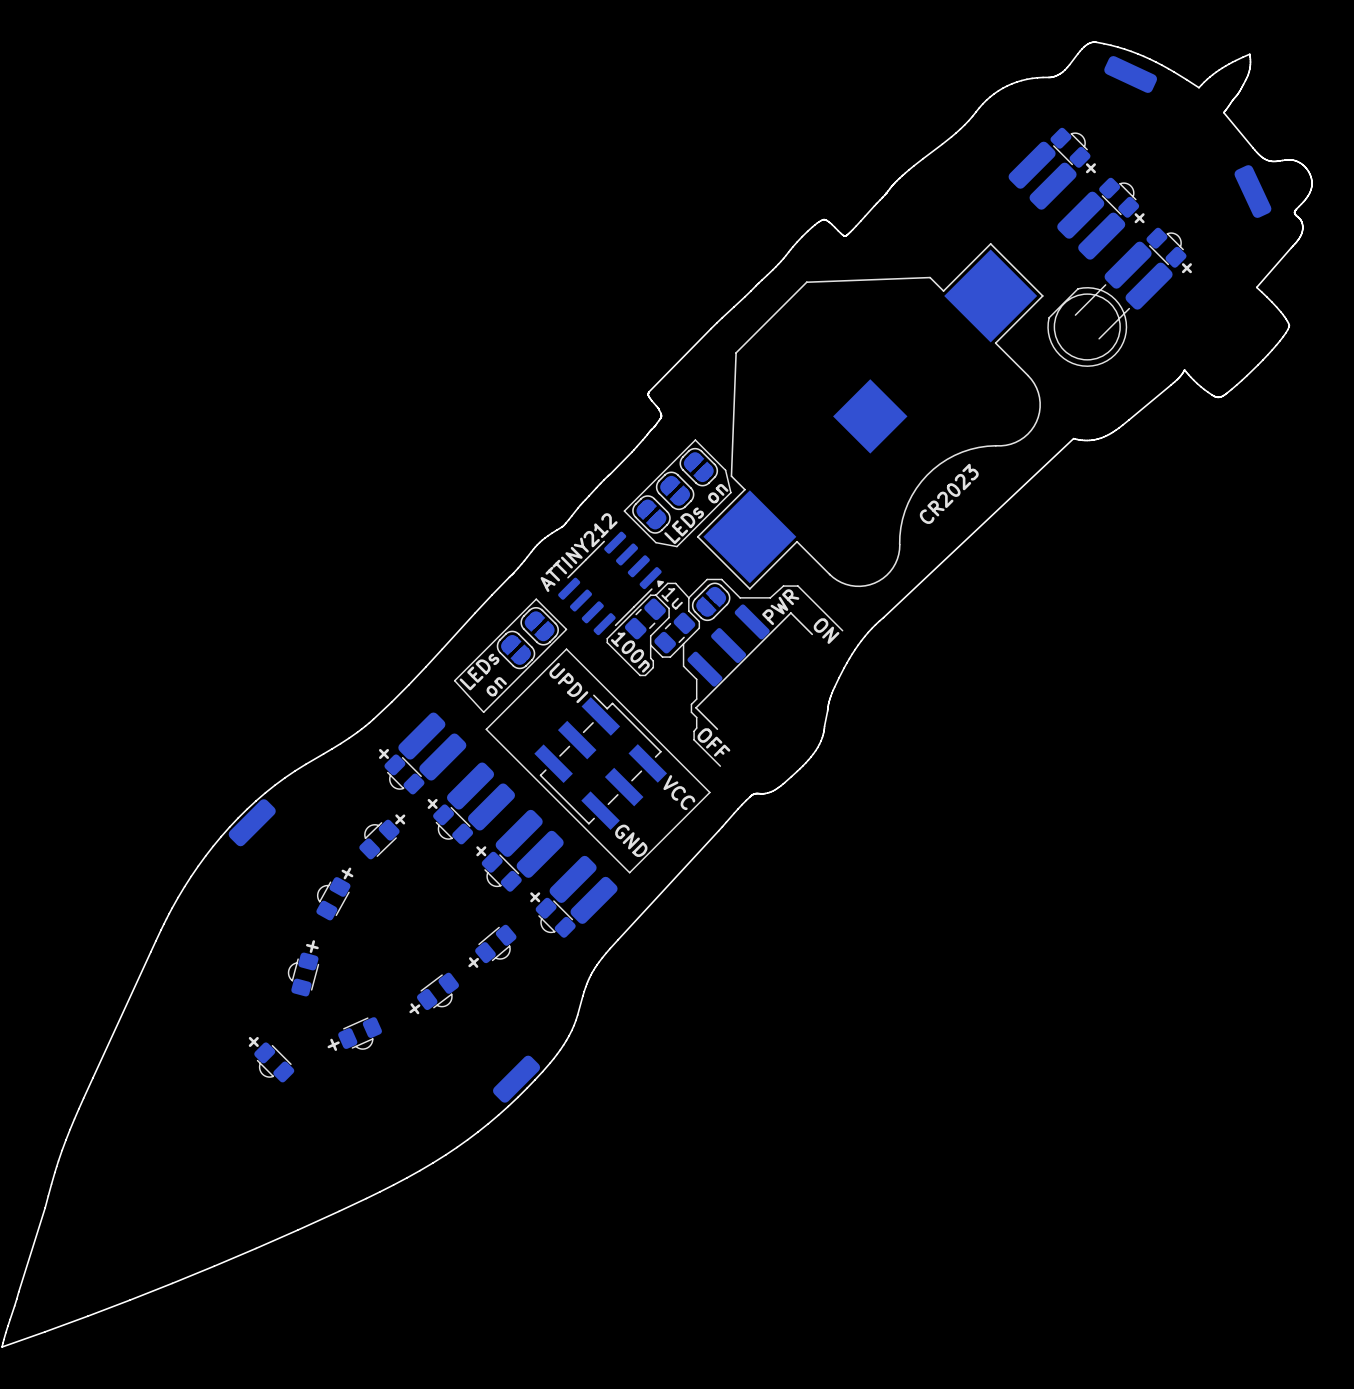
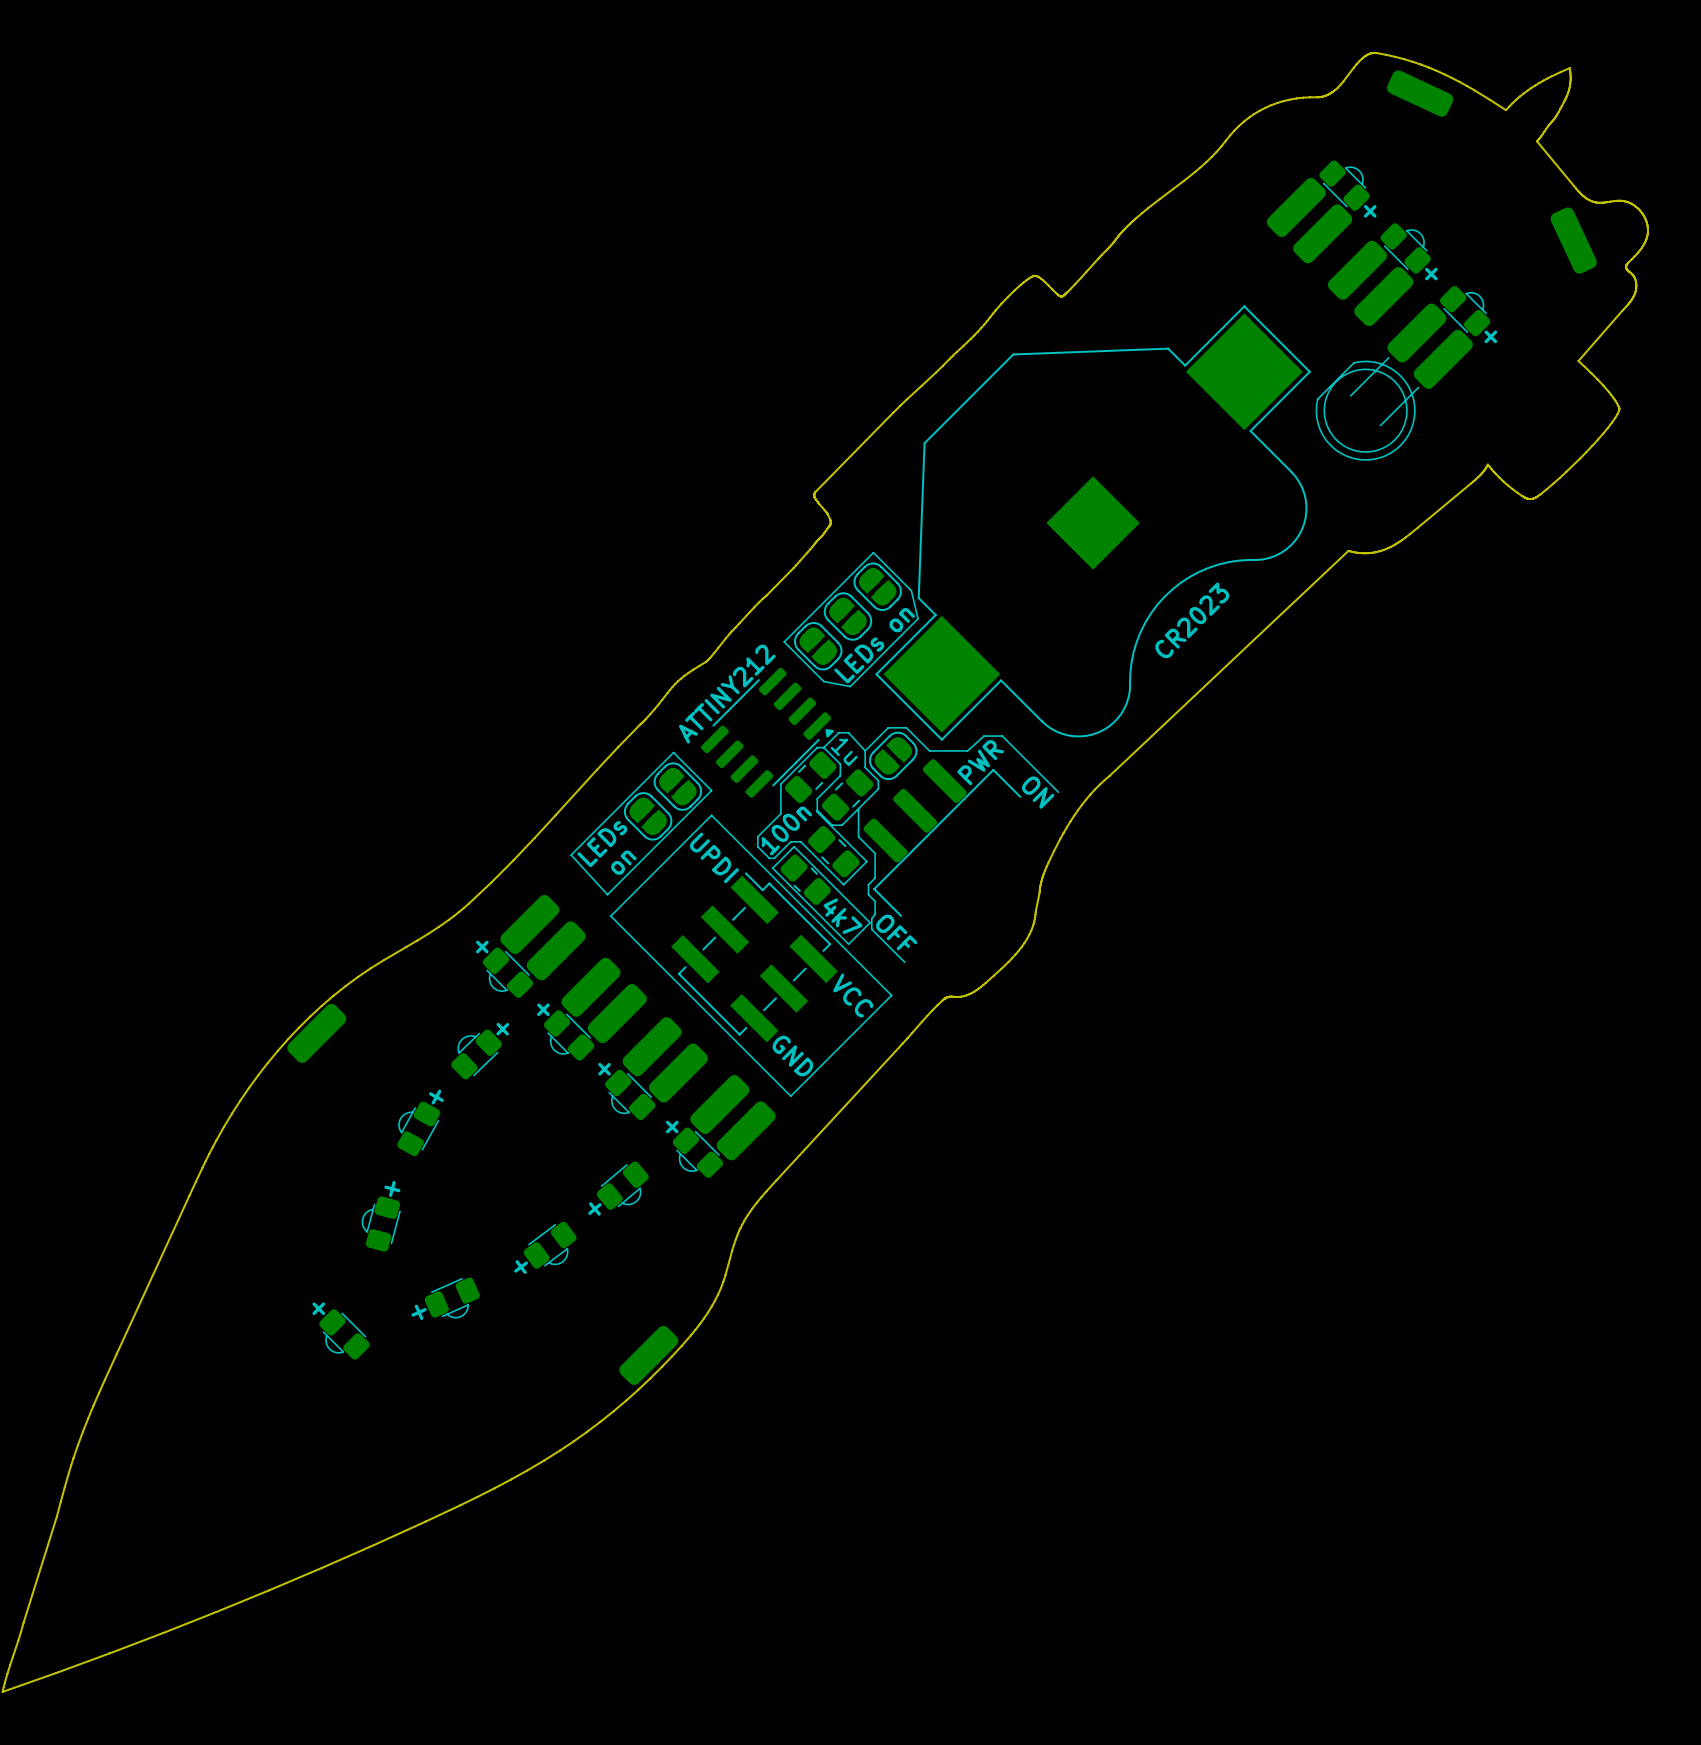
line: (621, 624) (607, 638) (607, 642) (640, 675) (645, 675) (653, 667) (650, 646) -> (780, 783) (780, 813) (757, 836) (757, 846) (769, 858) (774, 858) (790, 841) (800, 841) (843, 884) (866, 861) (817, 812)
text rotation: 0° (630, 652) -> 90° counterclockwise (786, 830)
line: none -> (794, 846) (772, 868) (848, 944) (870, 922) (794, 846)
part: none -> (833, 851)
part: none -> (805, 879)
text: none -> 4k7 (843, 916)

